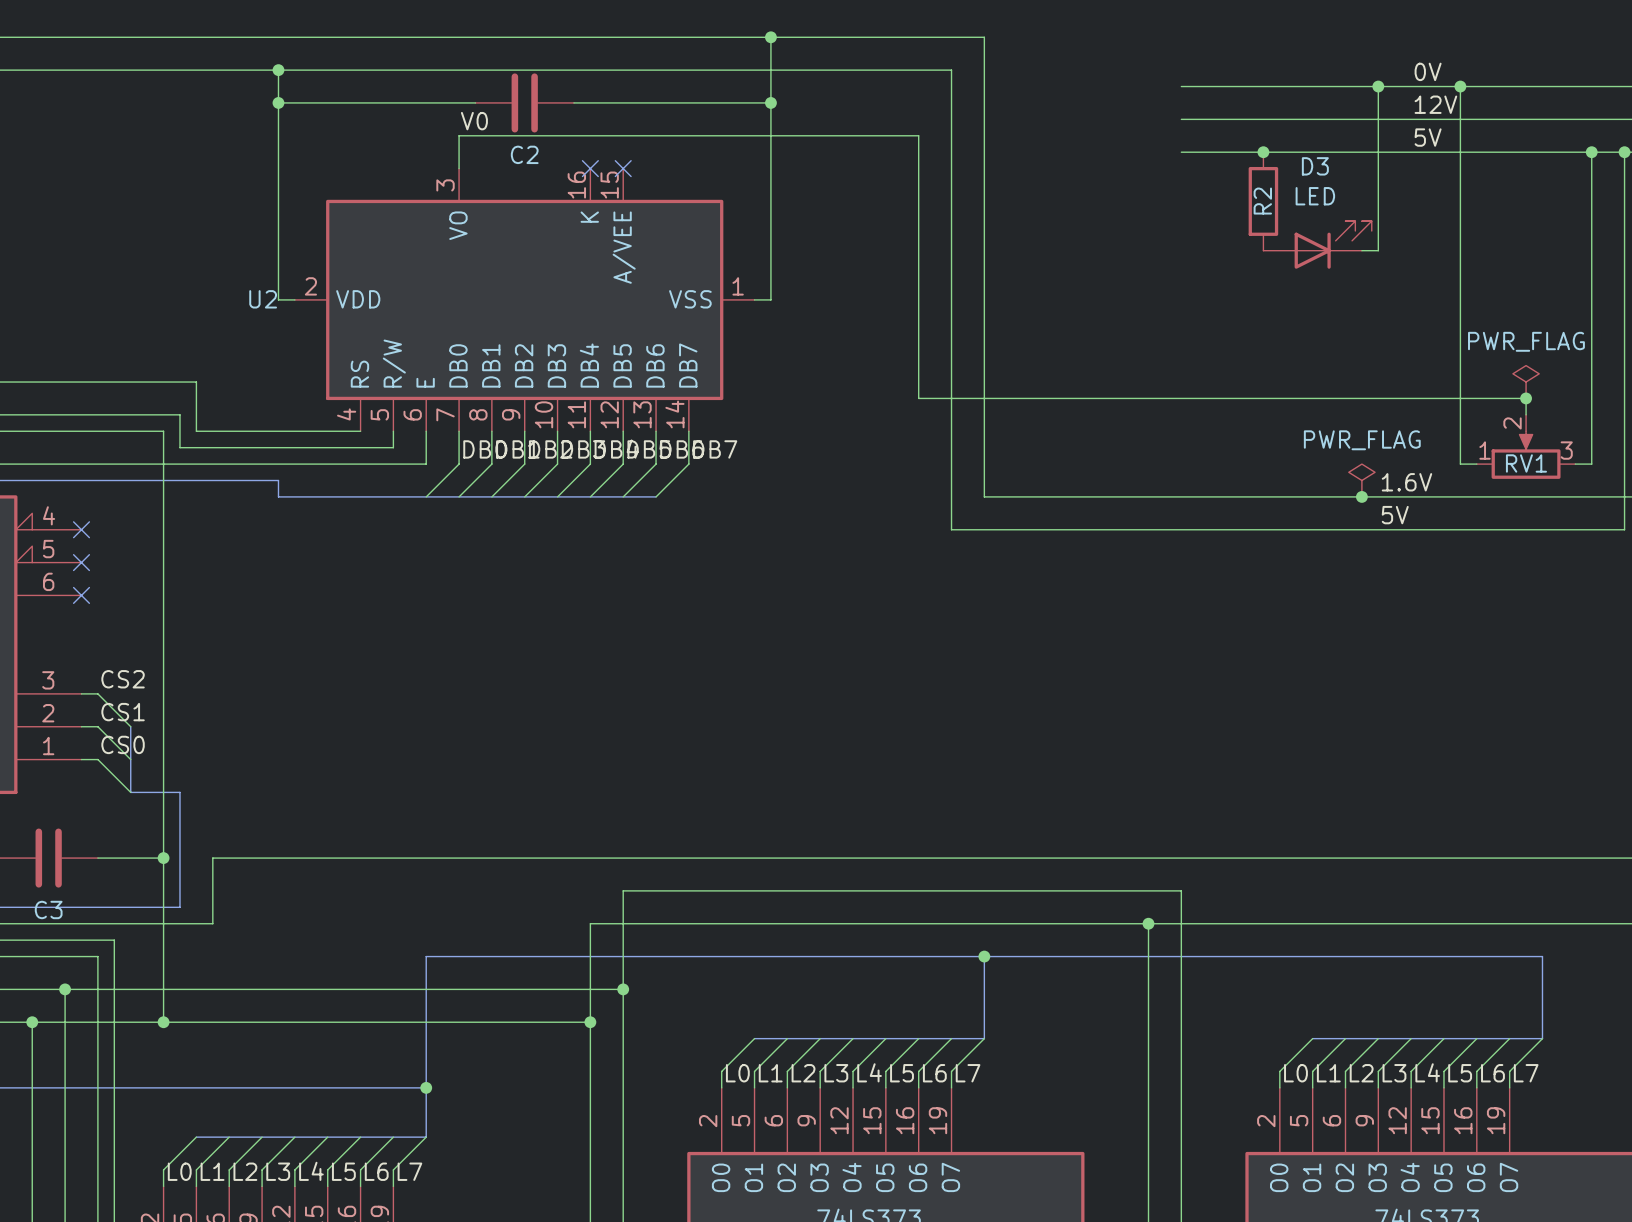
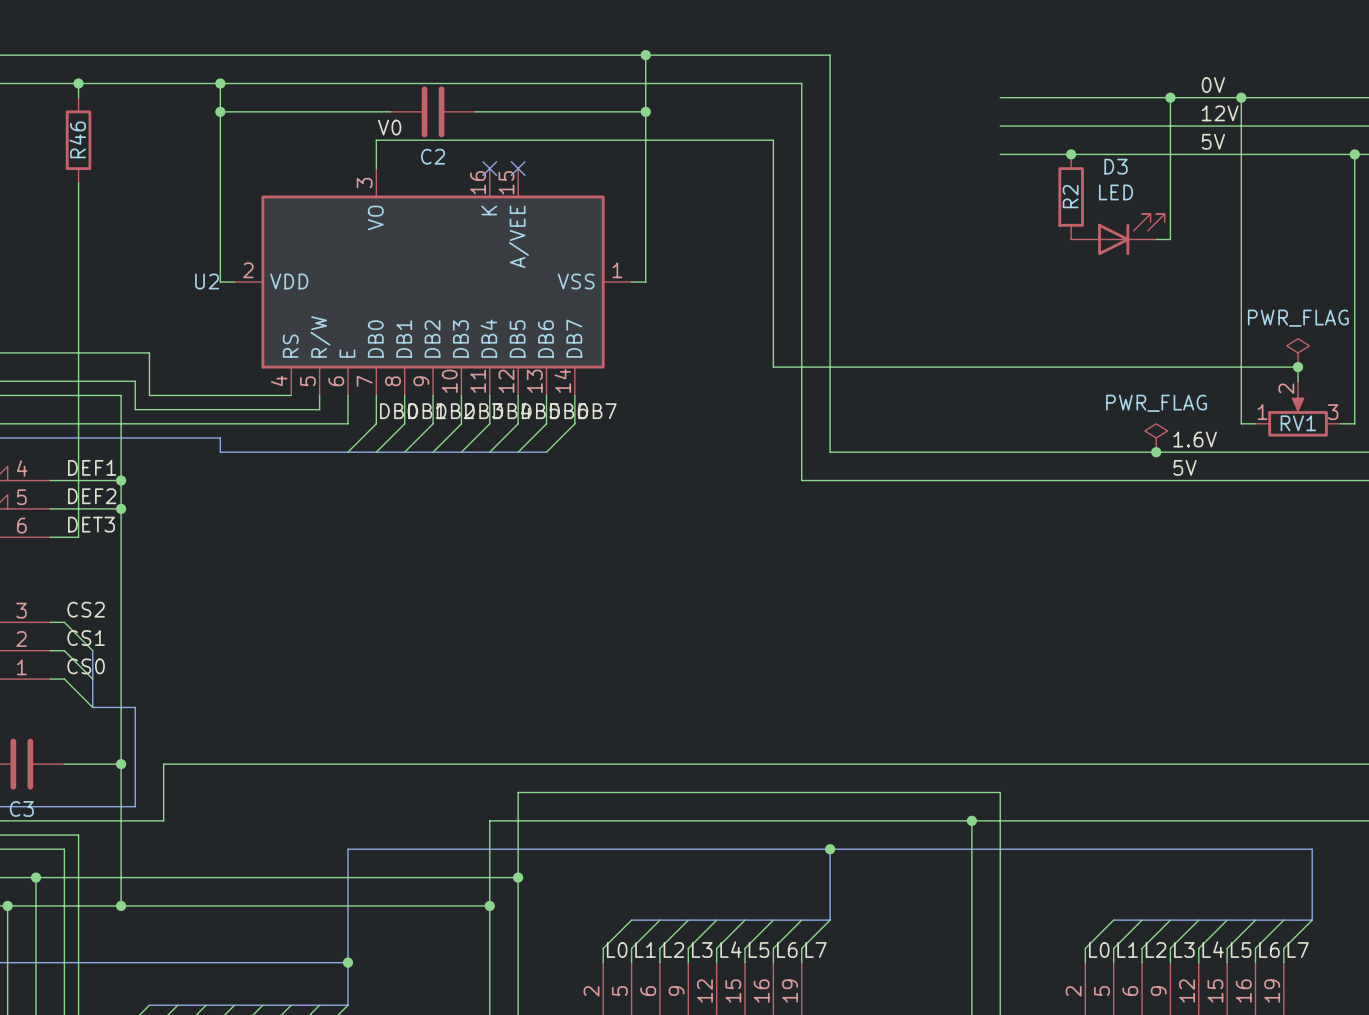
wire: none -> (78, 83) (78, 97)
junction: none -> (78, 83)
R46: none -> (78, 140)
wire: none -> (78, 182) (78, 537) (50, 537)
label: none -> DEF1 (92, 467)
wire: none -> (50, 480) (121, 480)
no-connect mark: (81, 529) -> none
junction: none -> (121, 480)
label: none -> DEF2 (92, 496)
wire: none -> (50, 508) (121, 508)
no-connect mark: (81, 562) -> none
junction: none -> (121, 508)
label: none -> DET3 (91, 524)
no-connect mark: (81, 595) -> none

